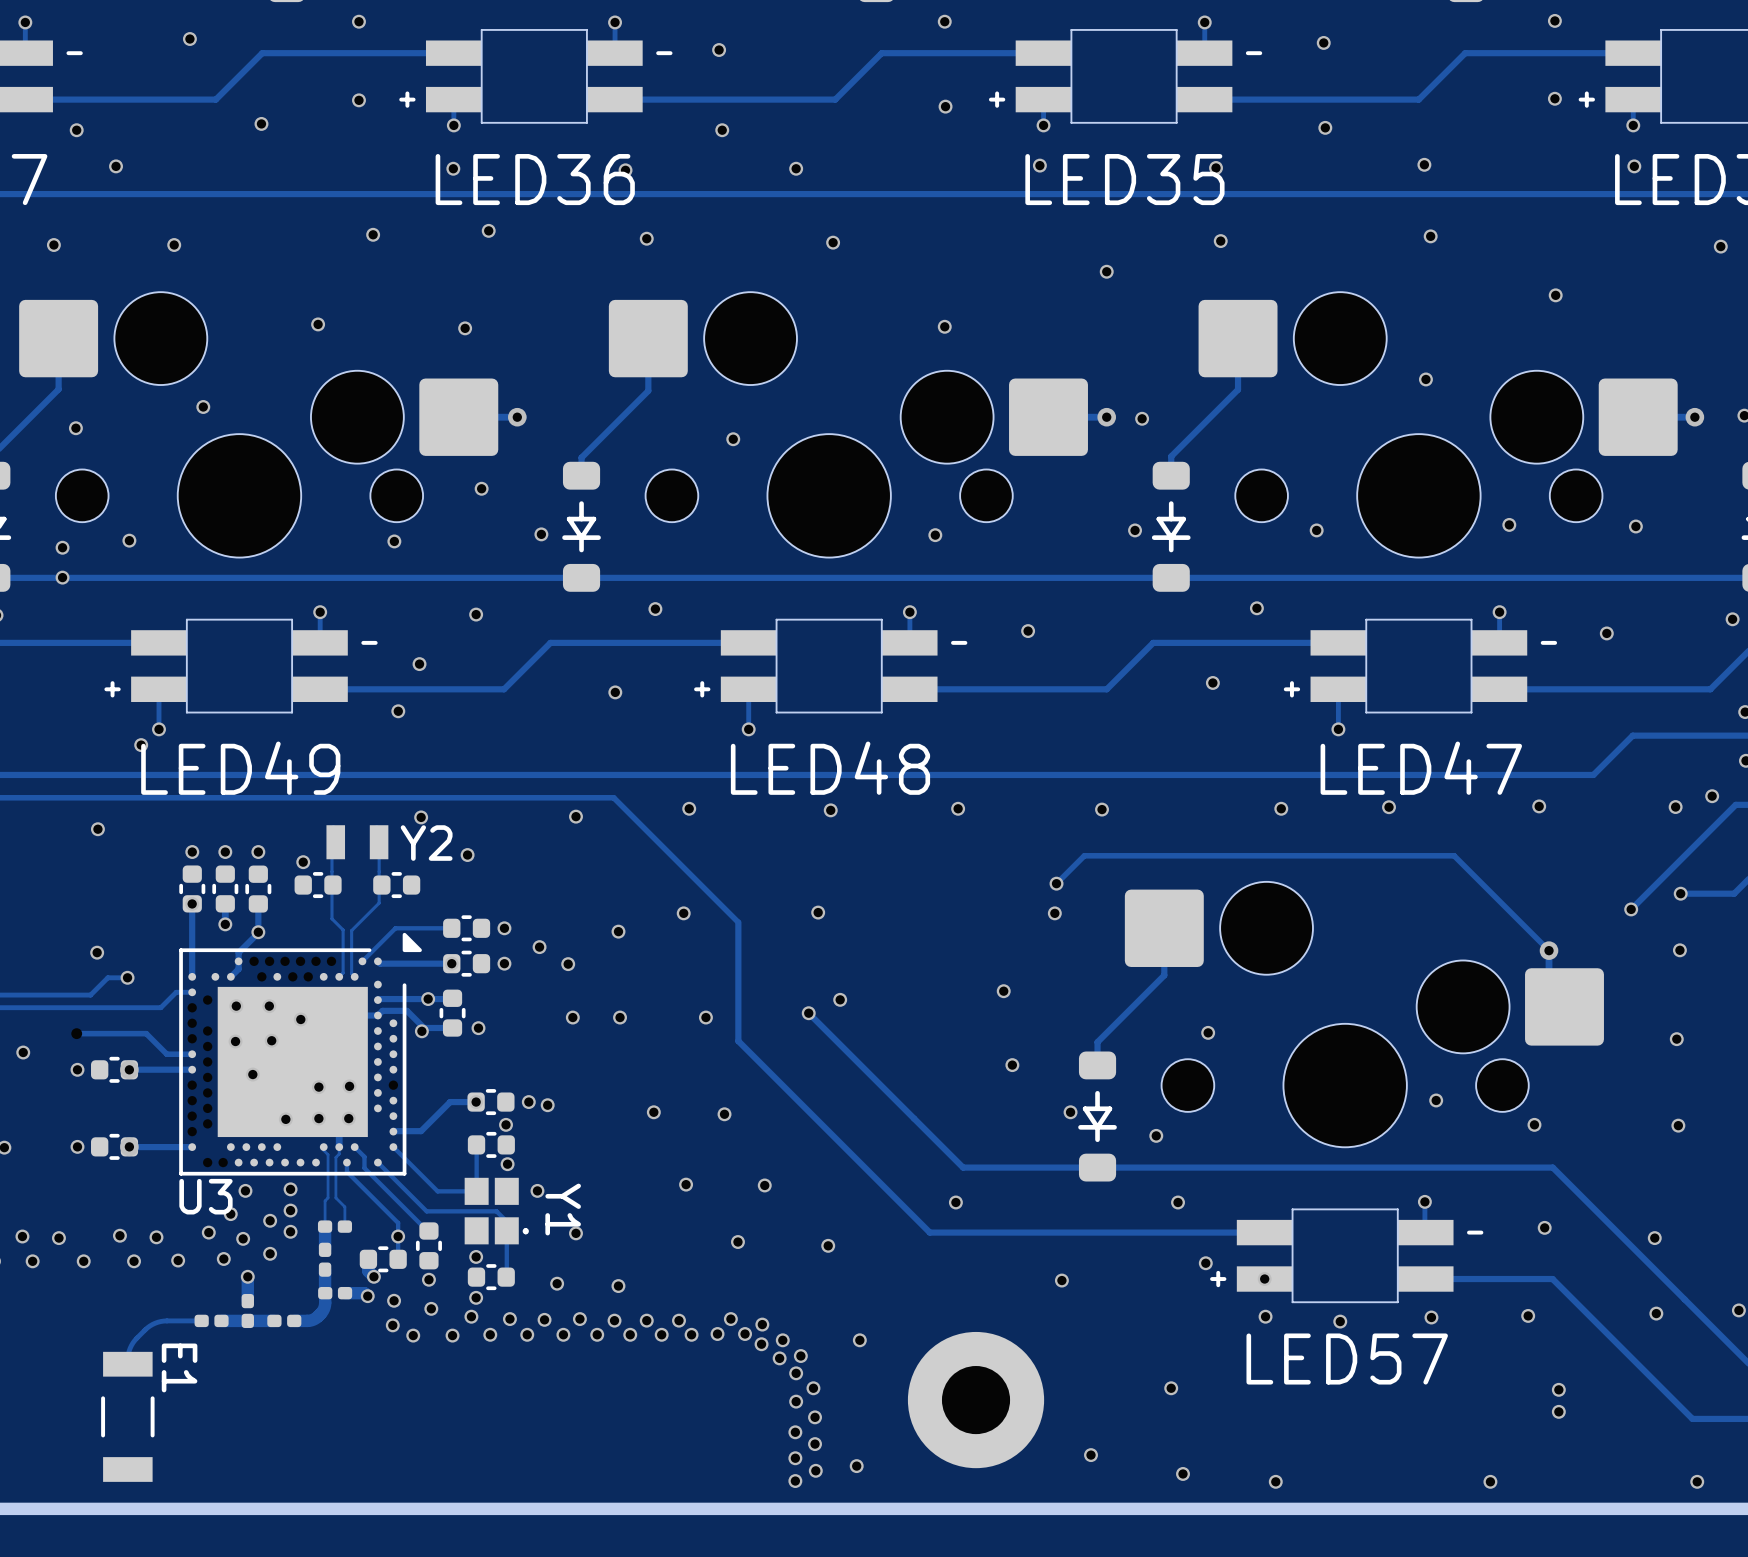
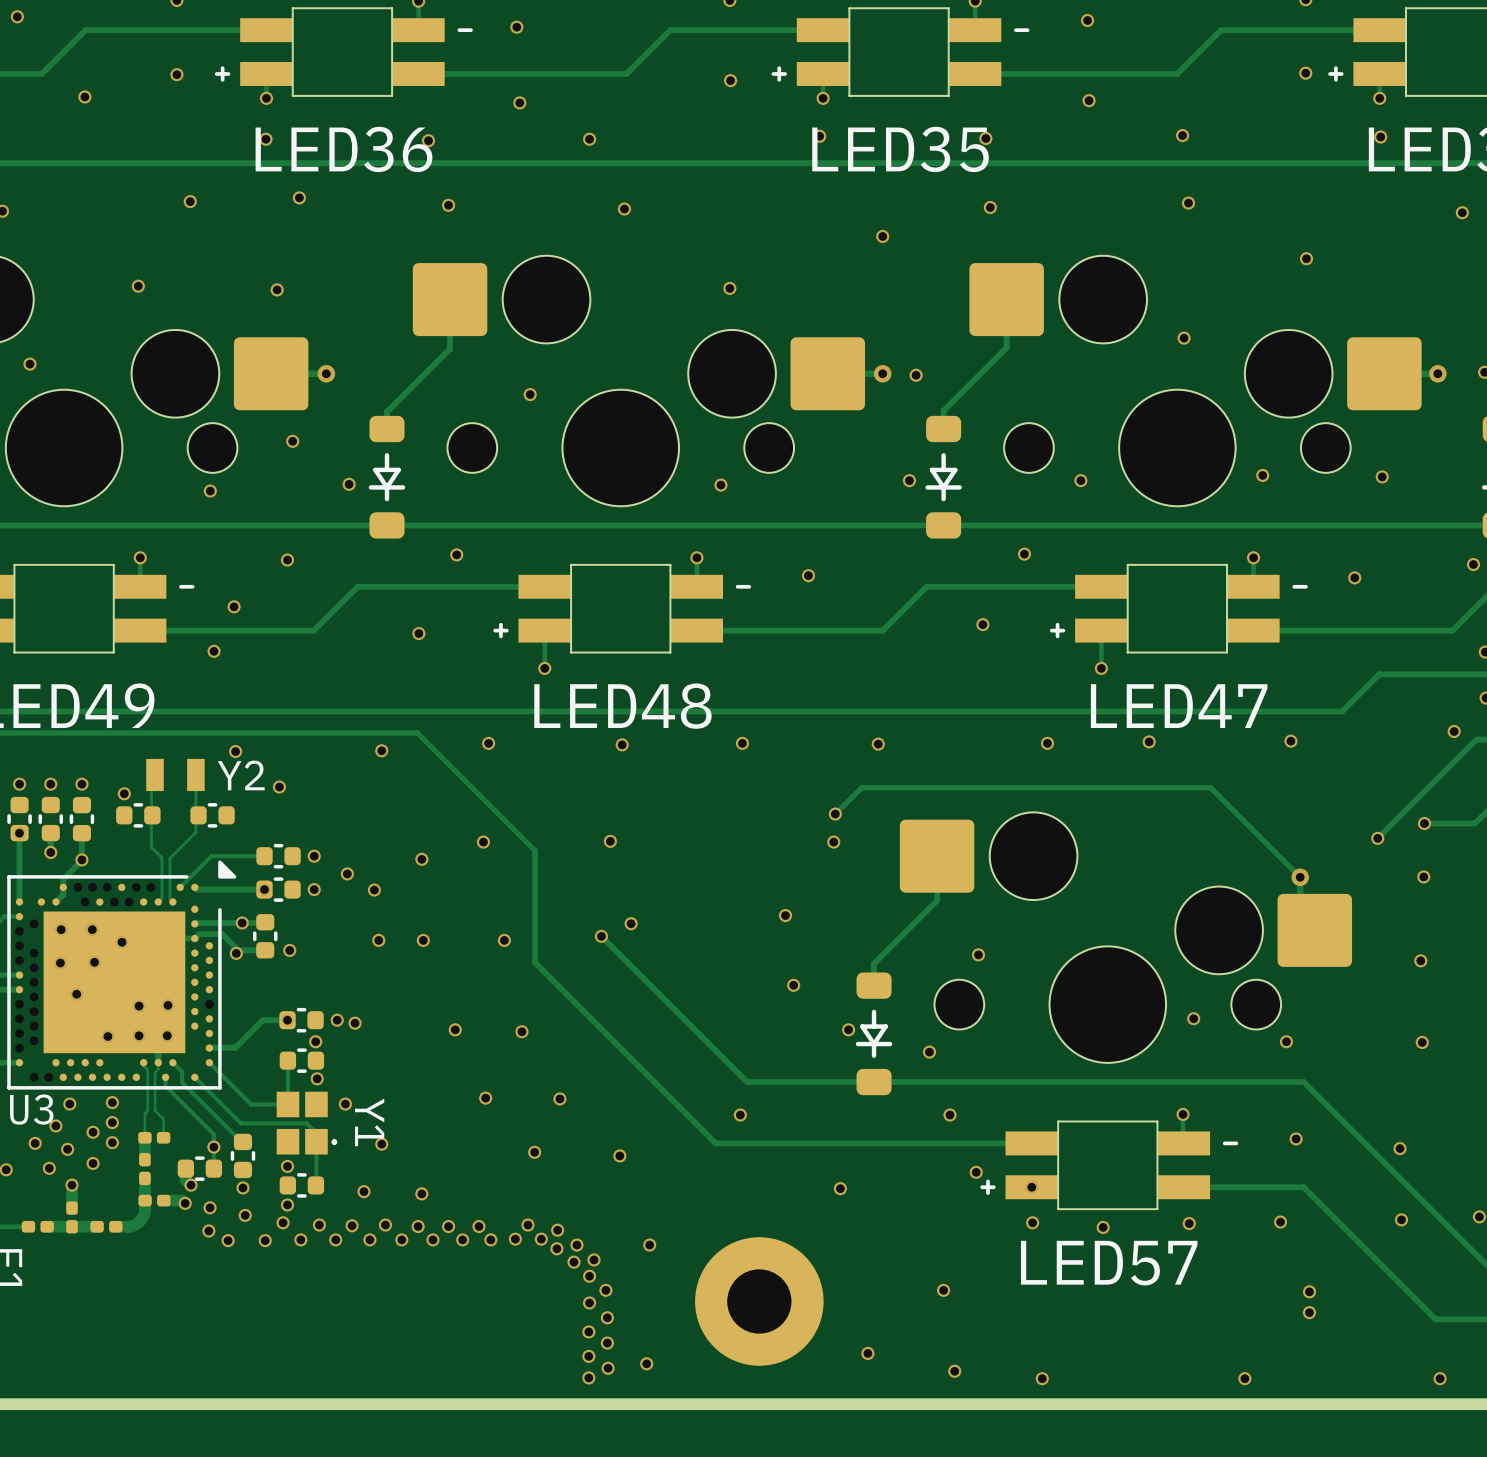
via: (1675, 807) -> none
via: (300, 961) -> none

